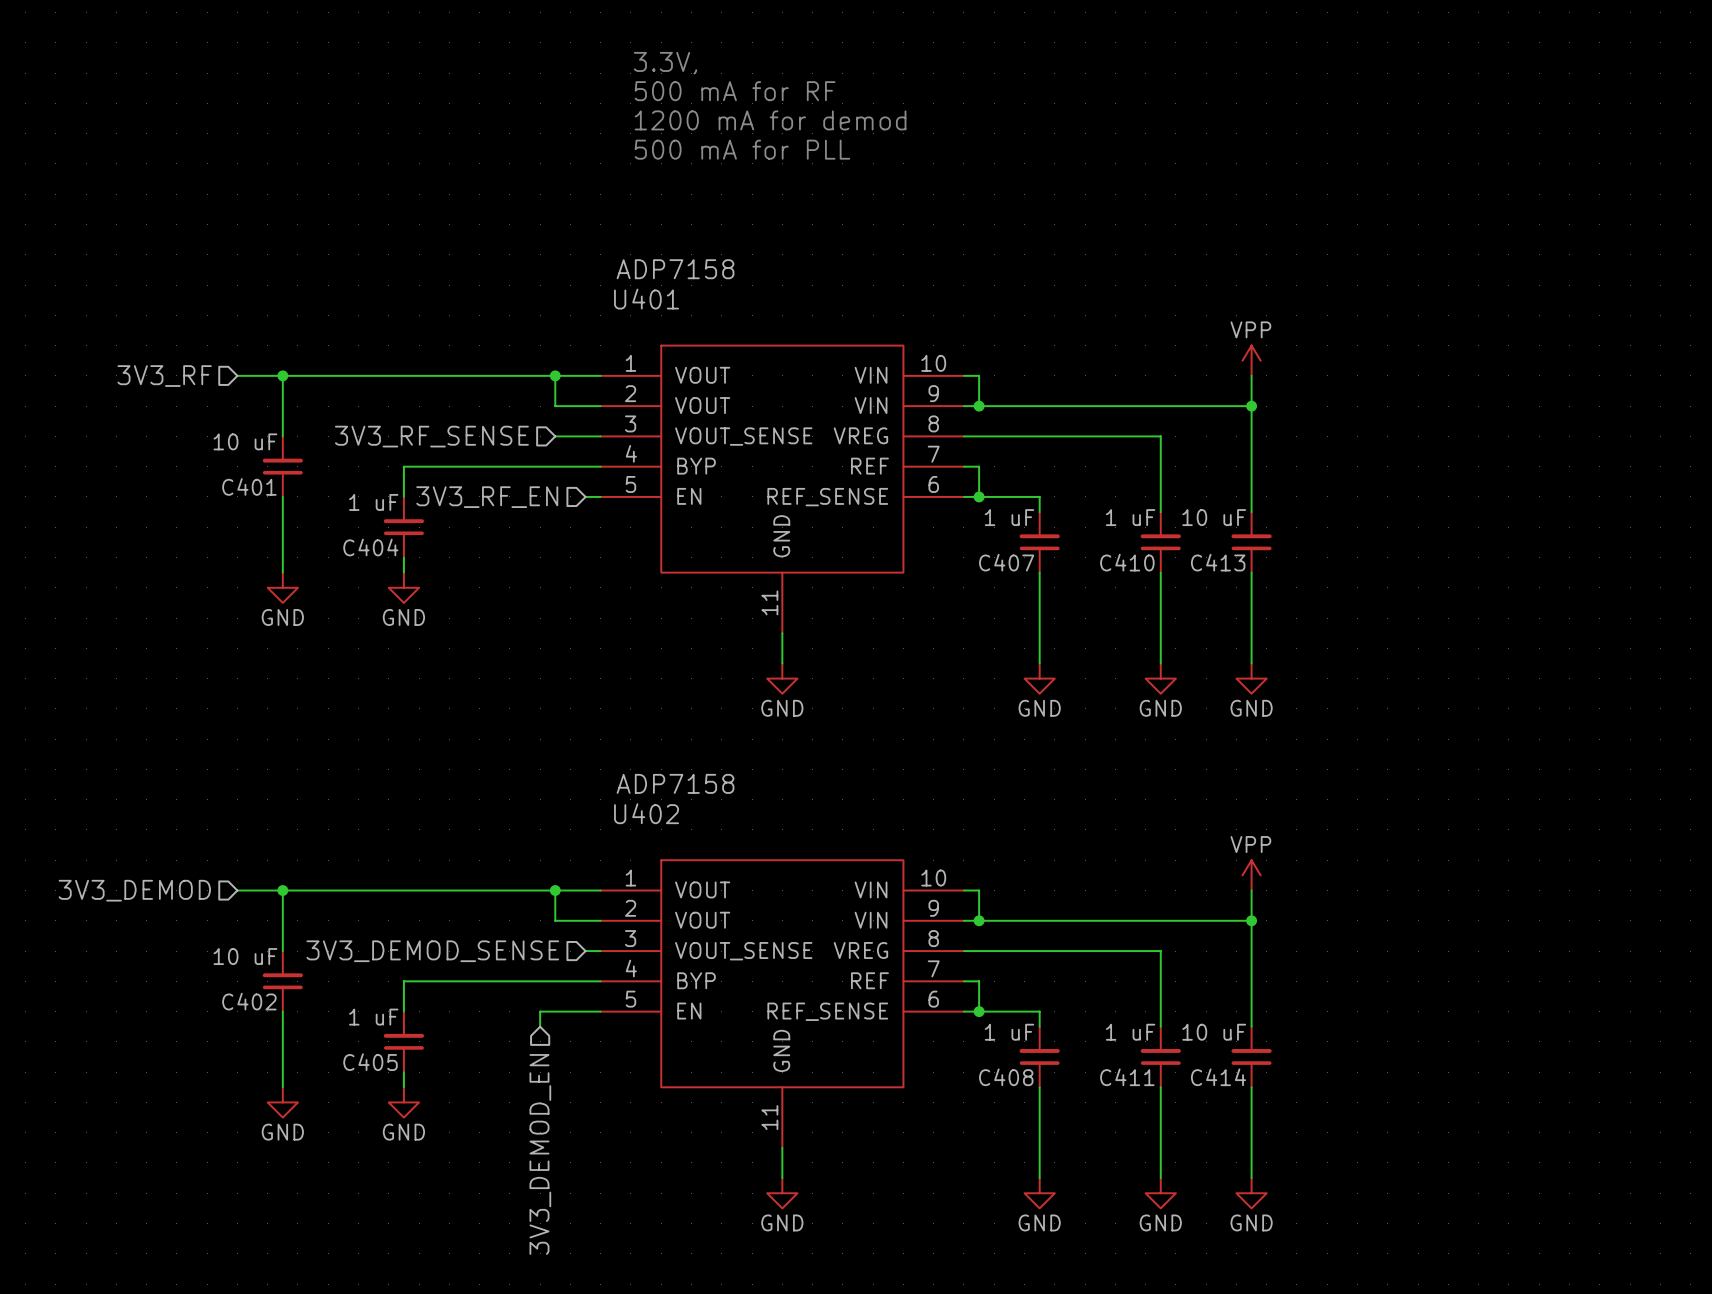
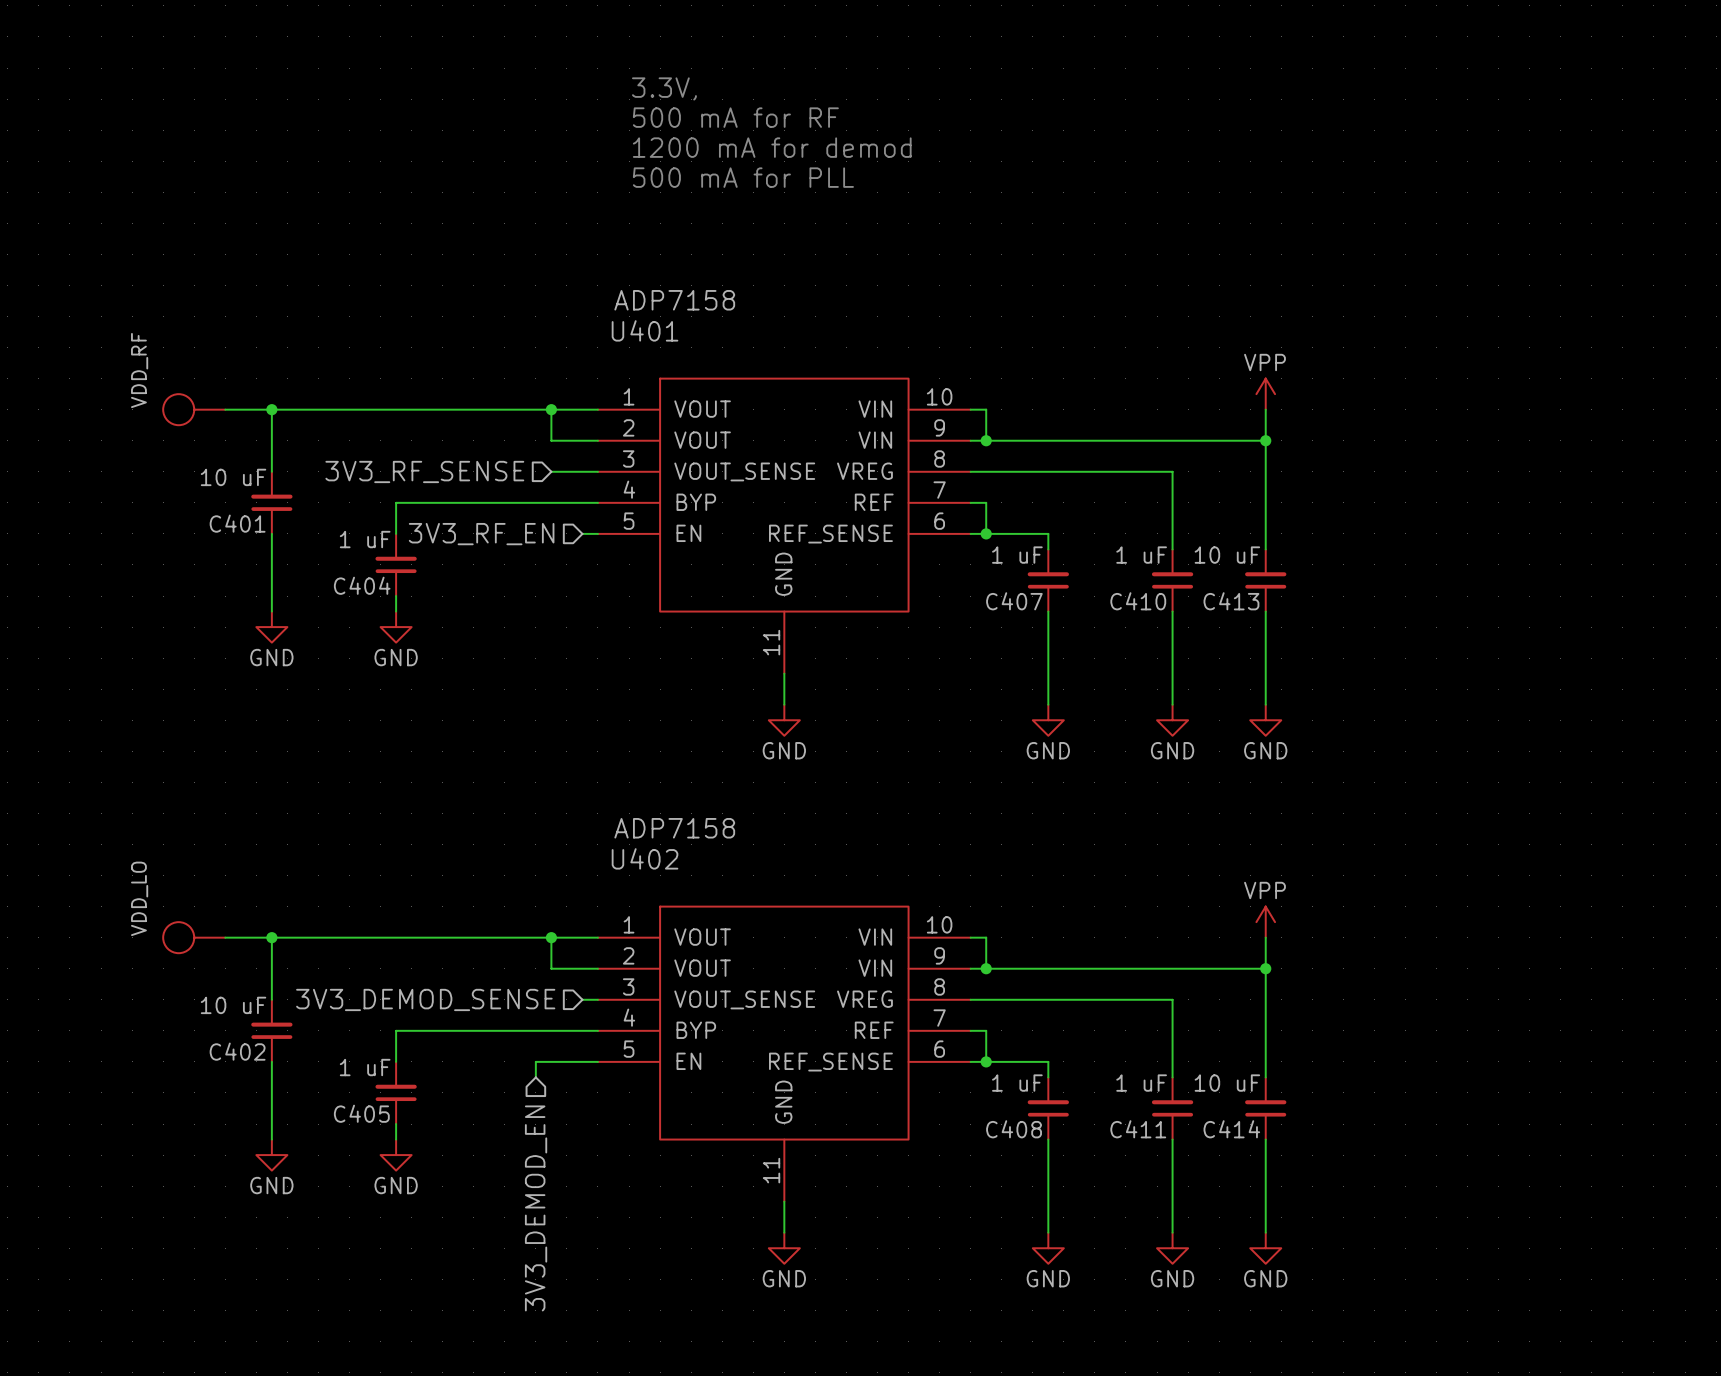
power symbol: none -> VDD_RF (194, 409)
hierarchical label: 3V3_RF (164, 376) -> none
hierarchical label: 3V3_DEMOD (134, 890) -> none
power symbol: none -> VDD_LO (194, 937)

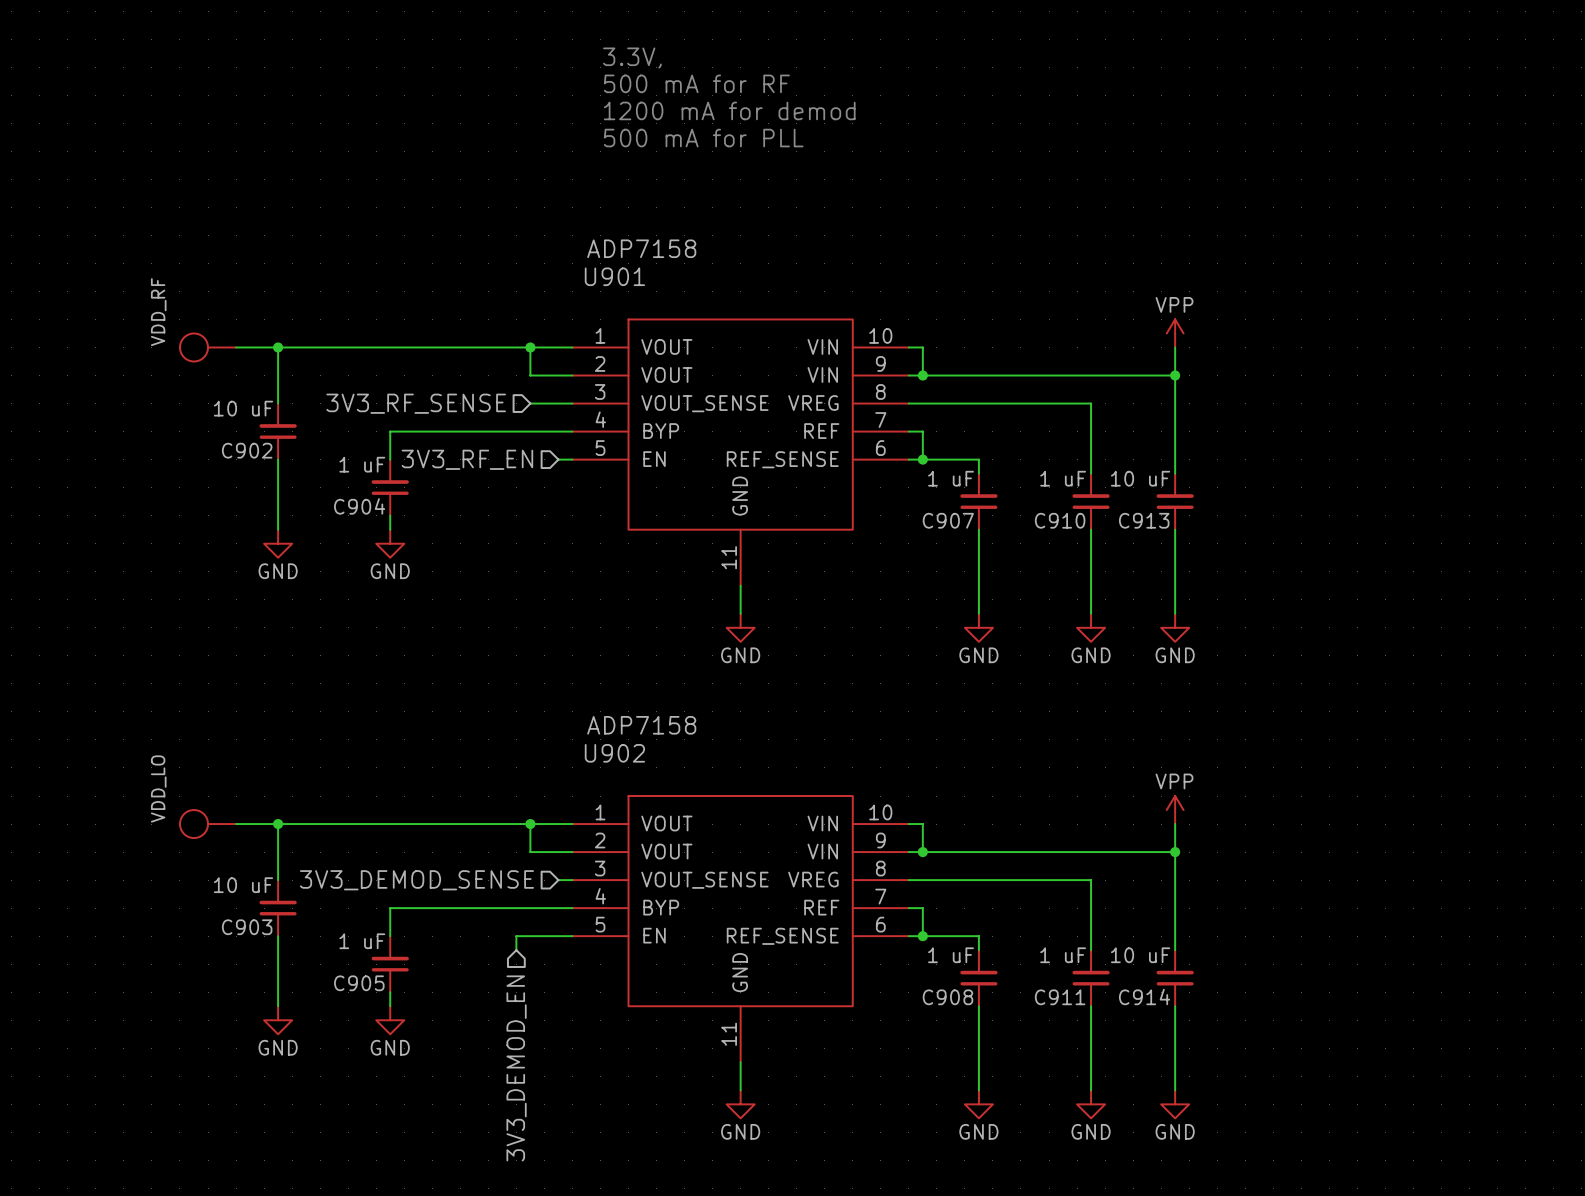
U401 name: U401 (645, 330) -> U901 (614, 276)
C401 name: C401 (237, 523) -> C902 (247, 450)
C404 name: C404 (362, 585) -> C904 (359, 506)
C407 name: C407 (1014, 601) -> C907 (948, 520)
C410 name: C410 (1138, 601) -> C910 (1060, 520)
C413 name: C413 (1231, 601) -> C913 (1144, 520)
U402 name: U402 (645, 858) -> U902 (614, 753)
C402 name: C402 (237, 1051) -> C903 (247, 927)
C405 name: C405 (361, 1113) -> C905 (359, 983)
C408 name: C408 (1014, 1129) -> C908 (947, 997)
C411 name: C411 (1138, 1129) -> C911 (1060, 997)
C414 name: C414 (1231, 1129) -> C914 (1144, 996)

